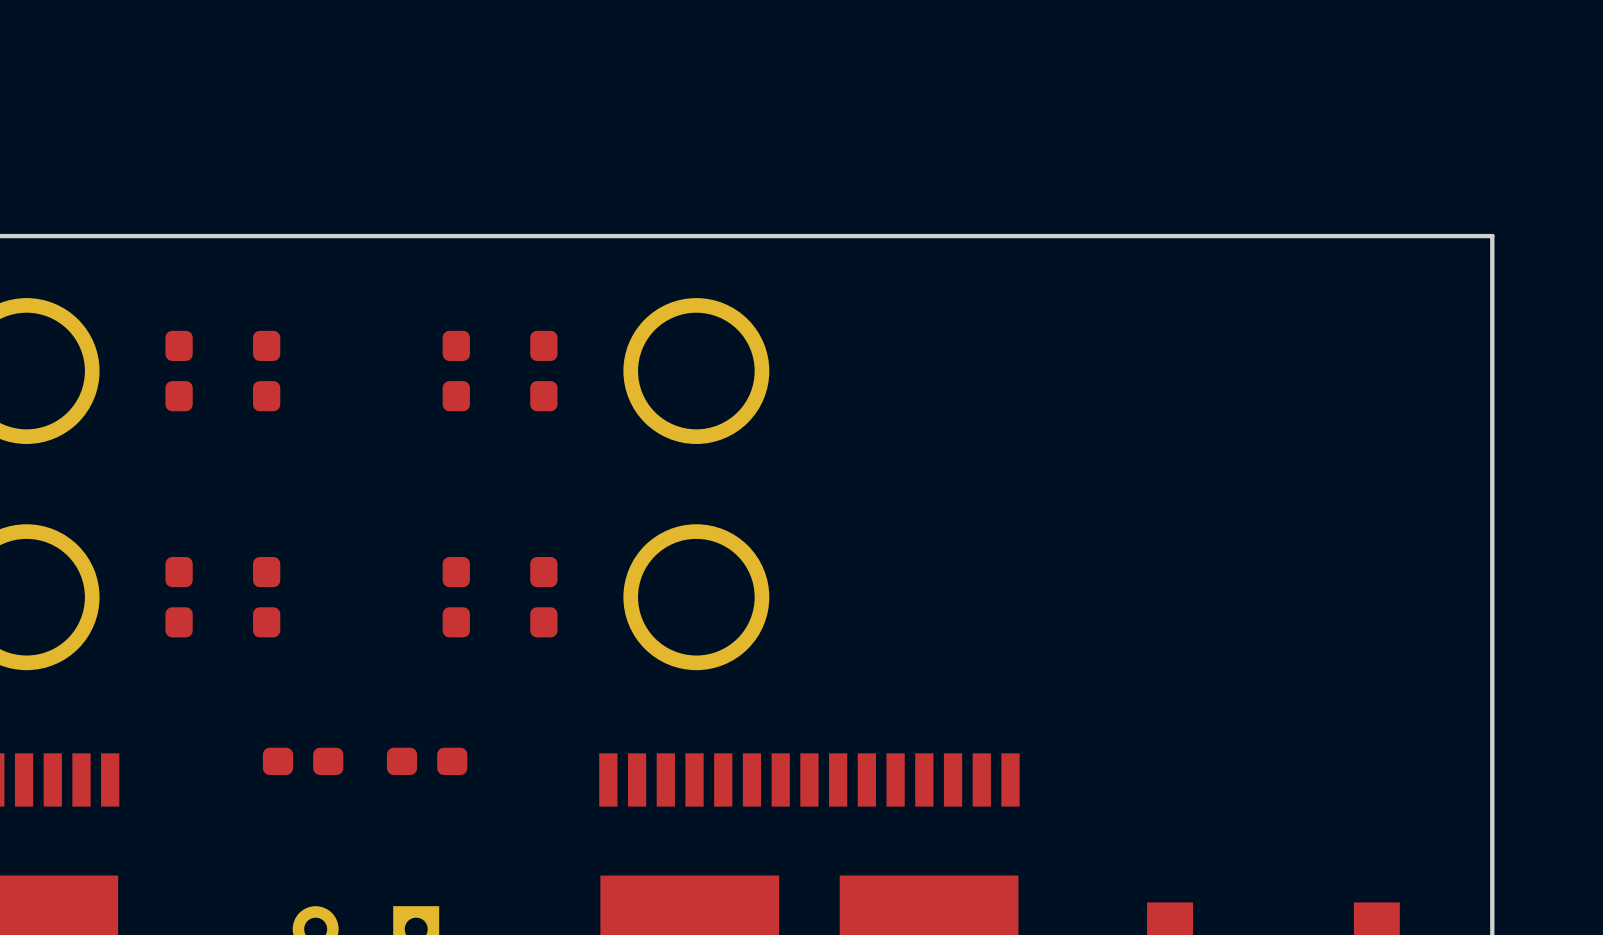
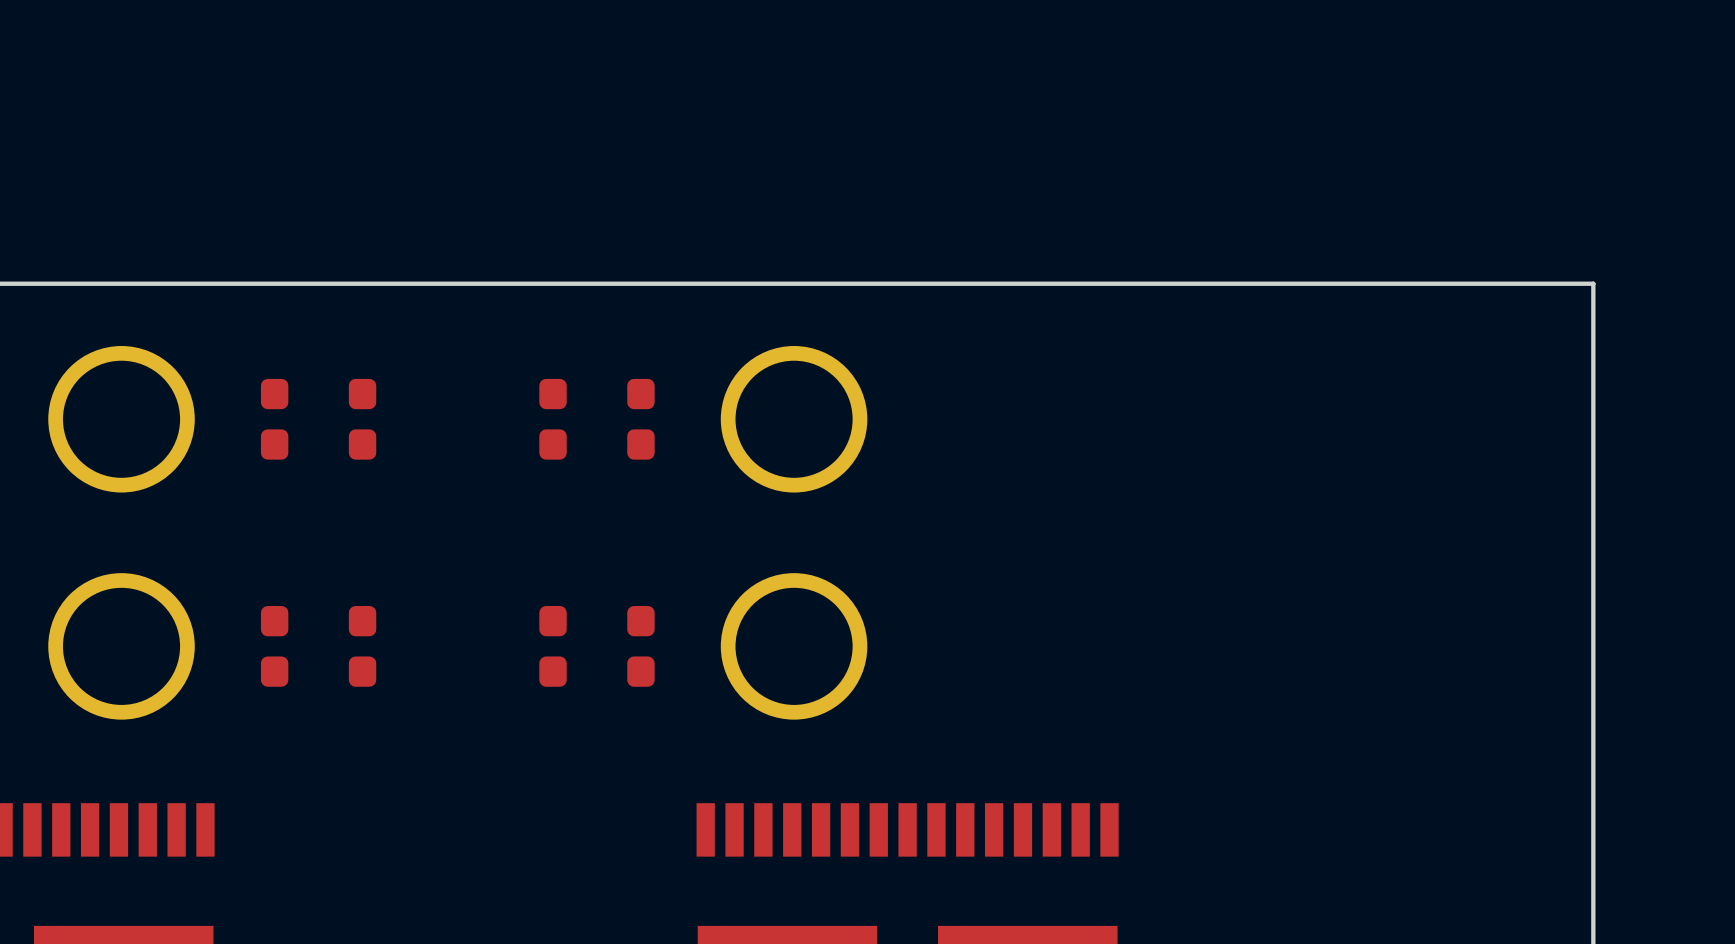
part: (303, 761) -> none
part: (427, 761) -> none

